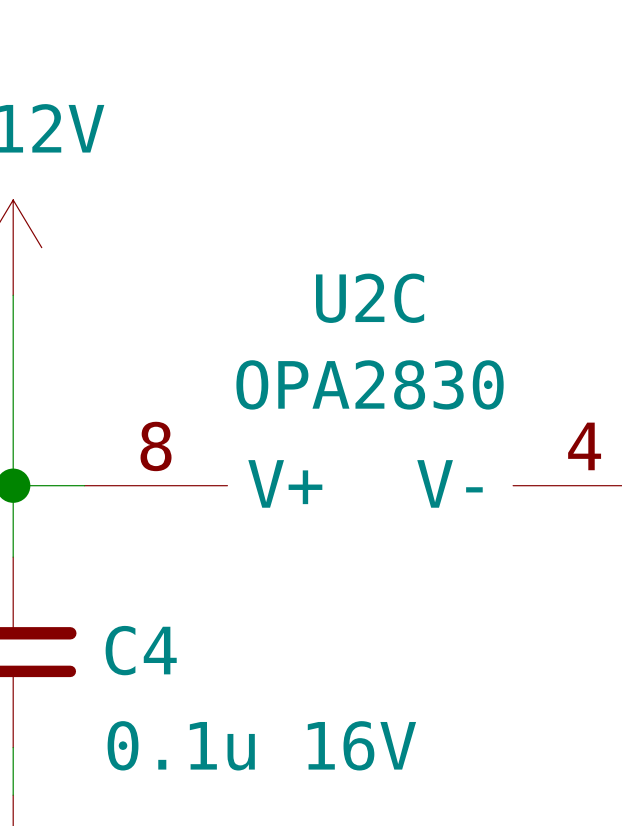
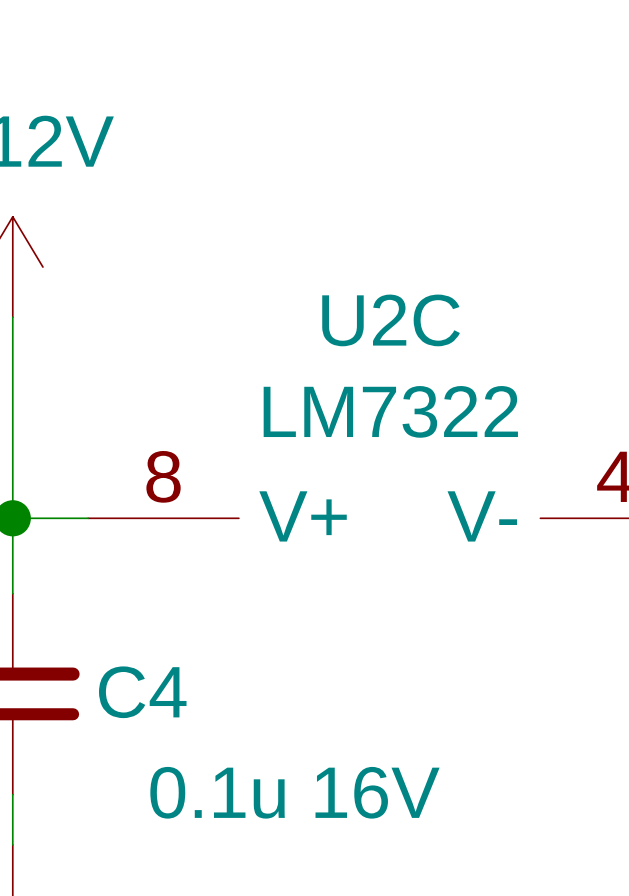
U2C value: OPA2830 (370, 384) -> LM7322 (390, 411)

